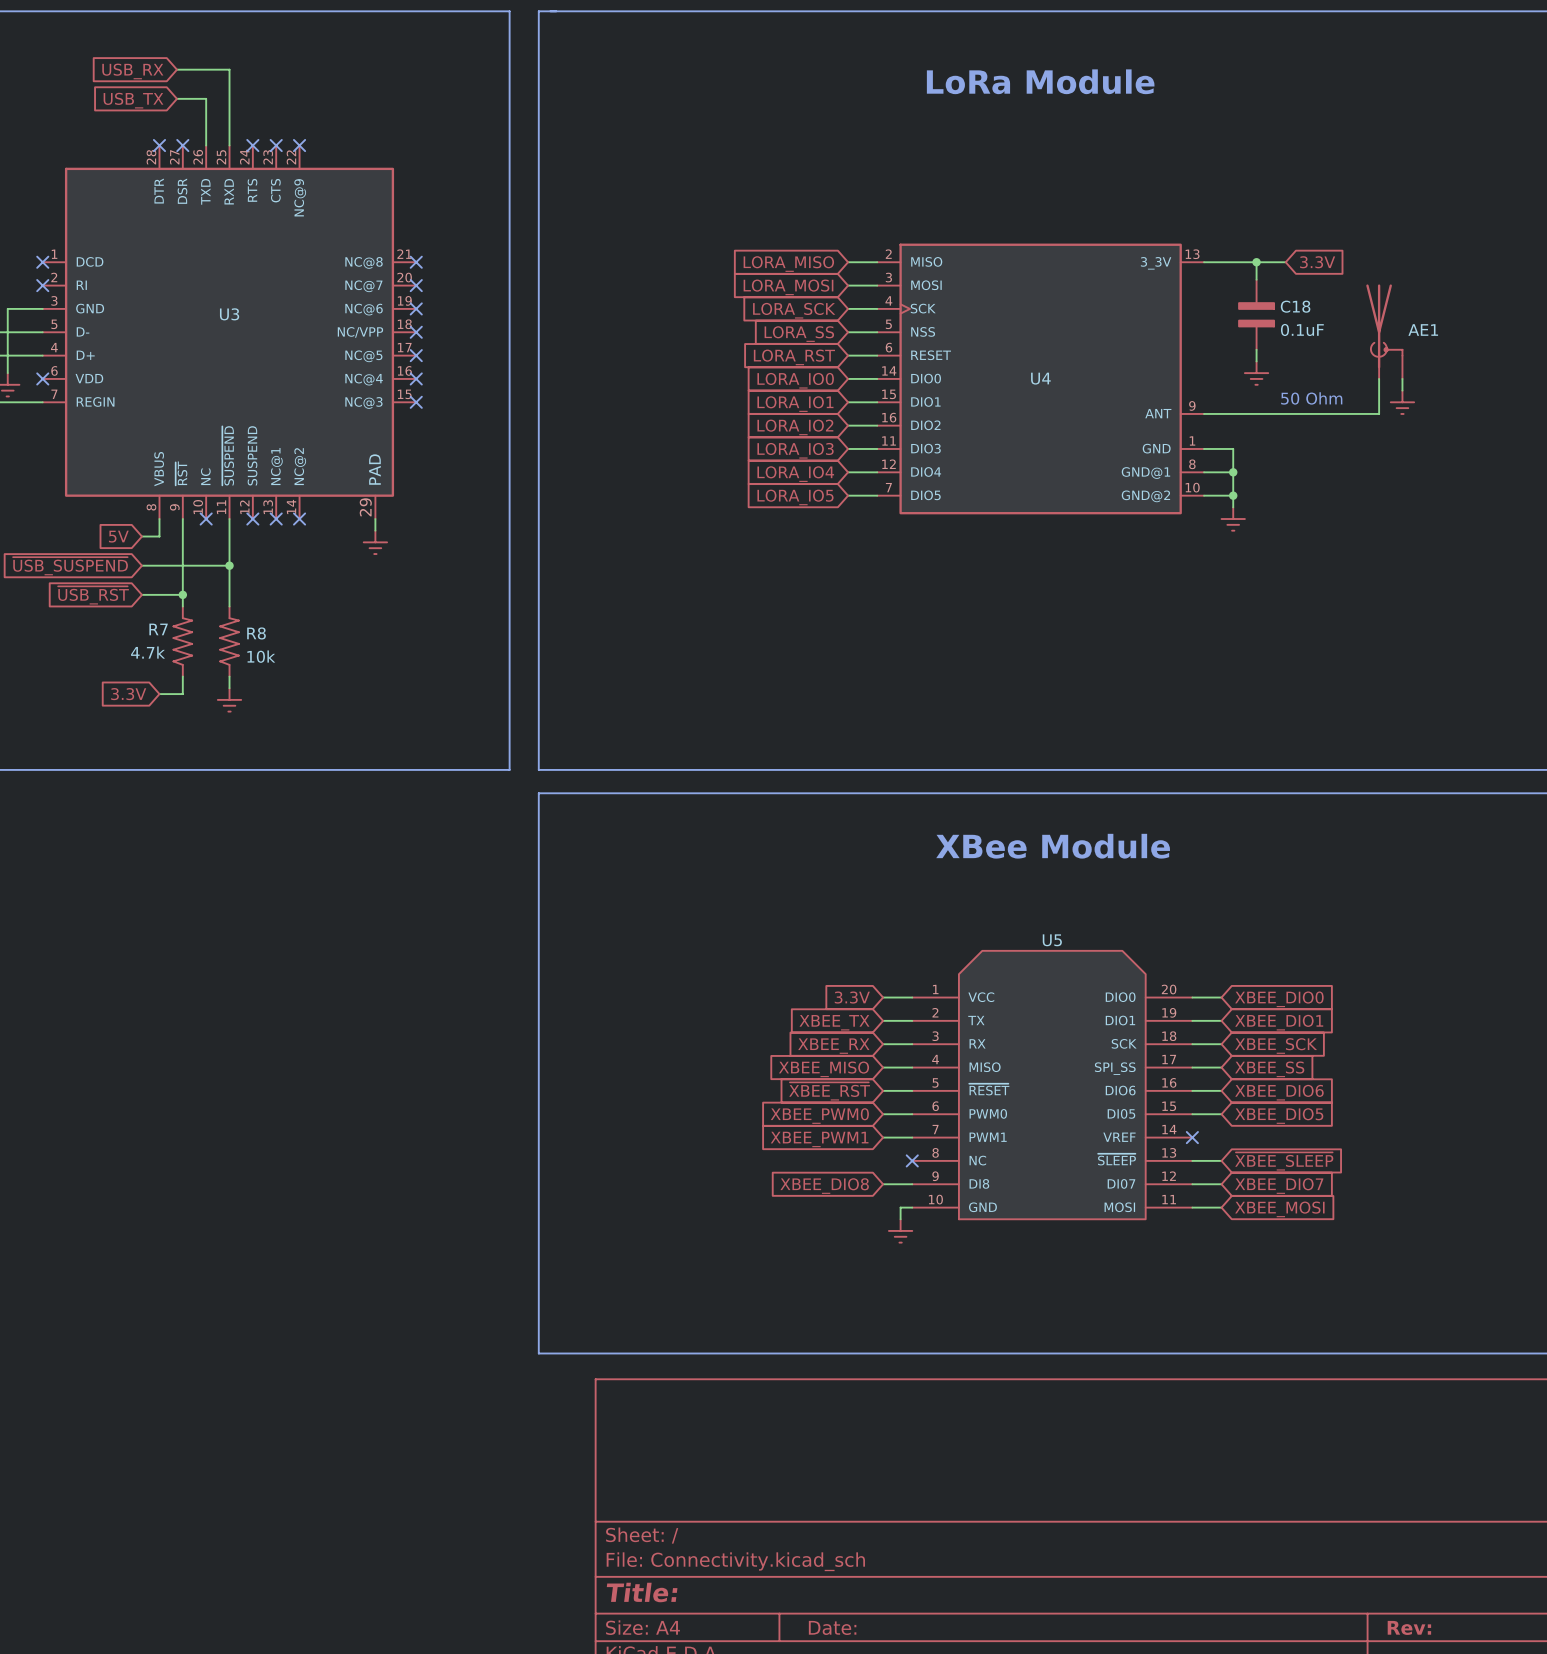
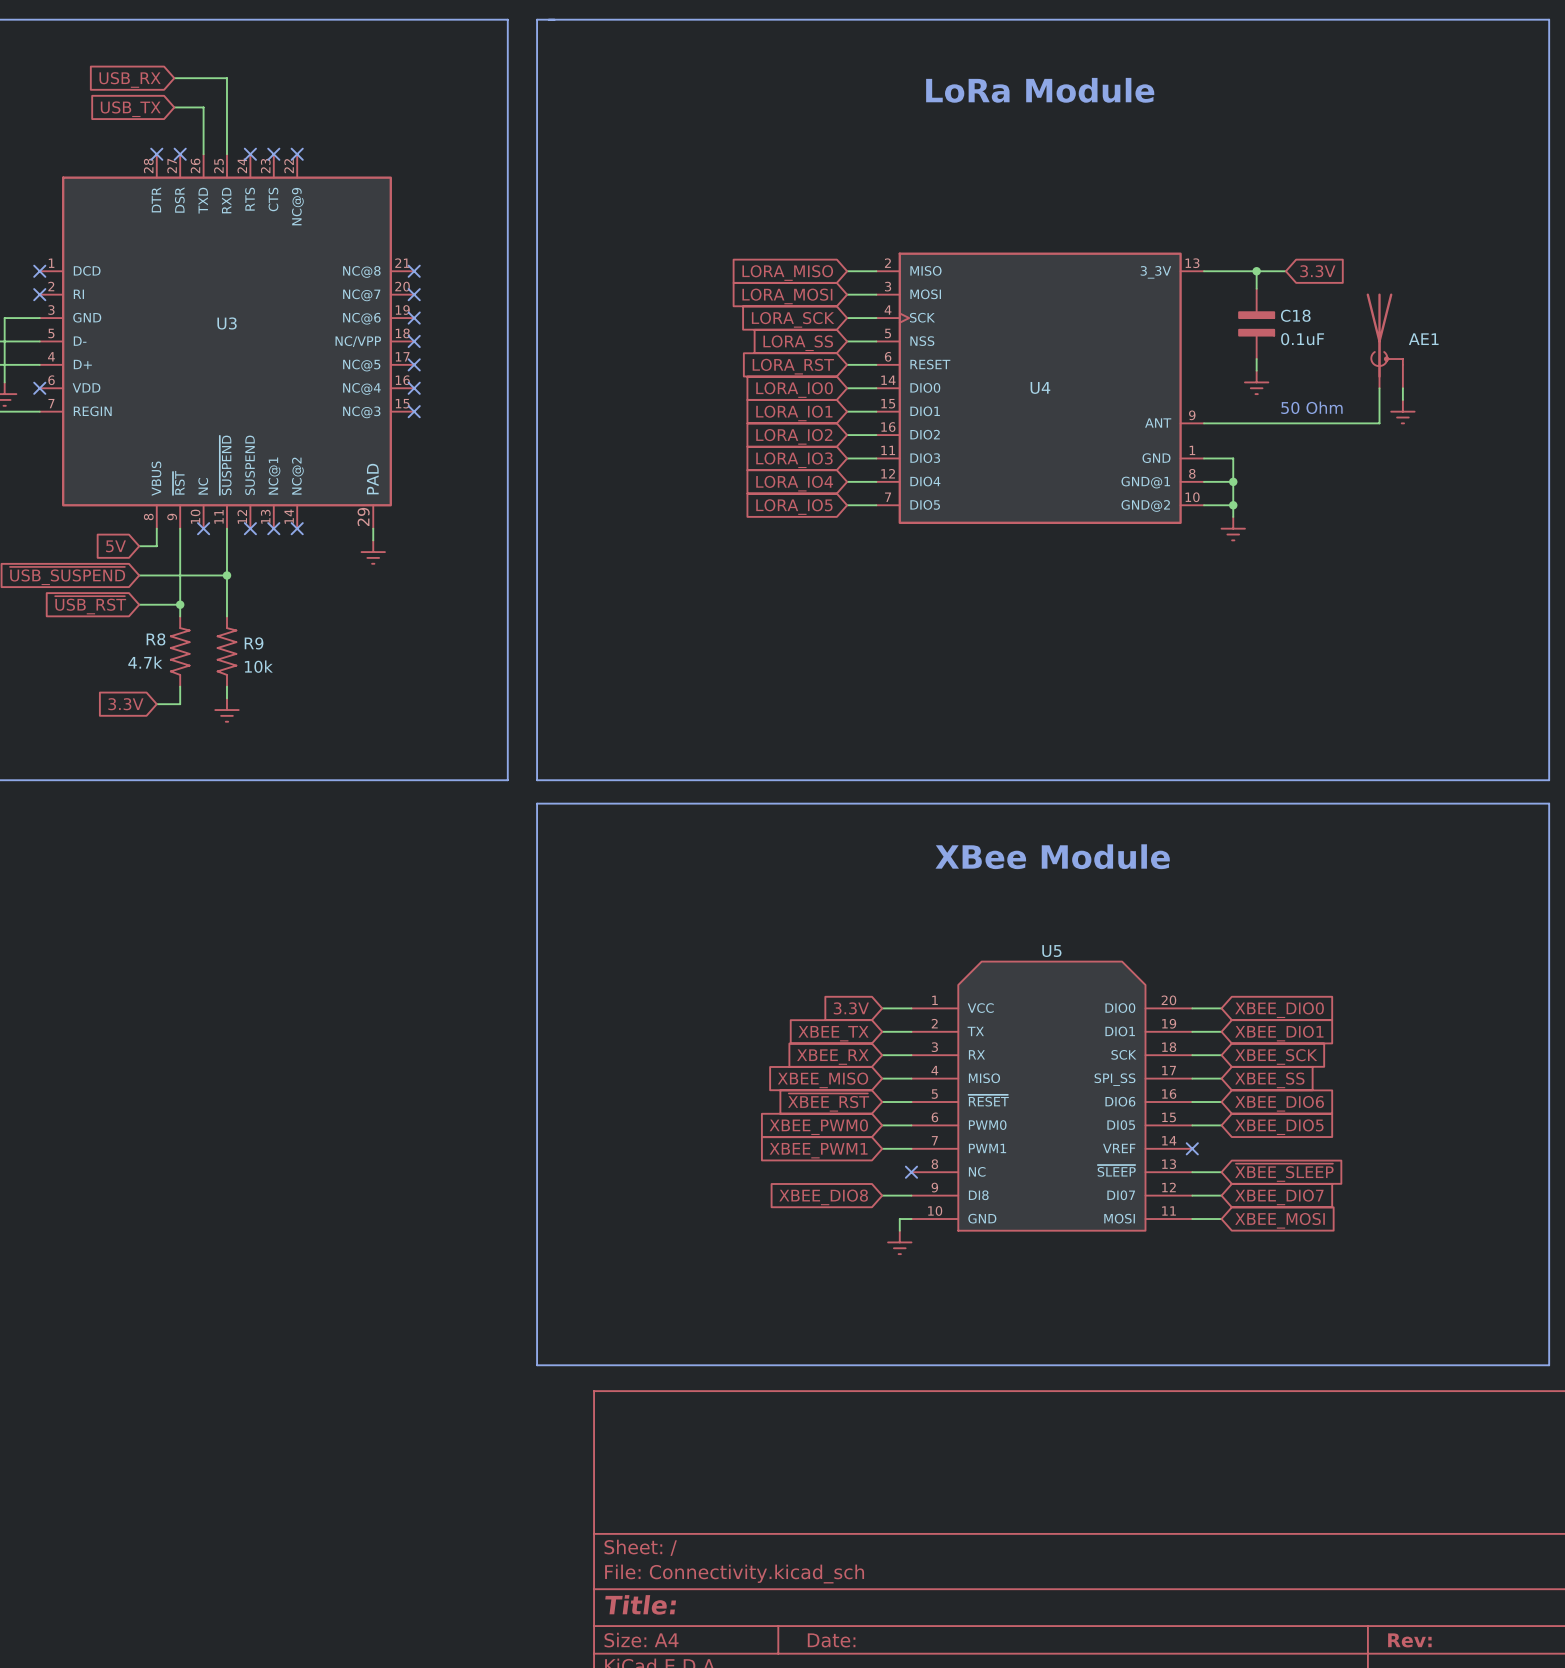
R7 name: R7 (158, 629) -> R8 (156, 639)
R8 name: R8 (256, 633) -> R9 (254, 643)

